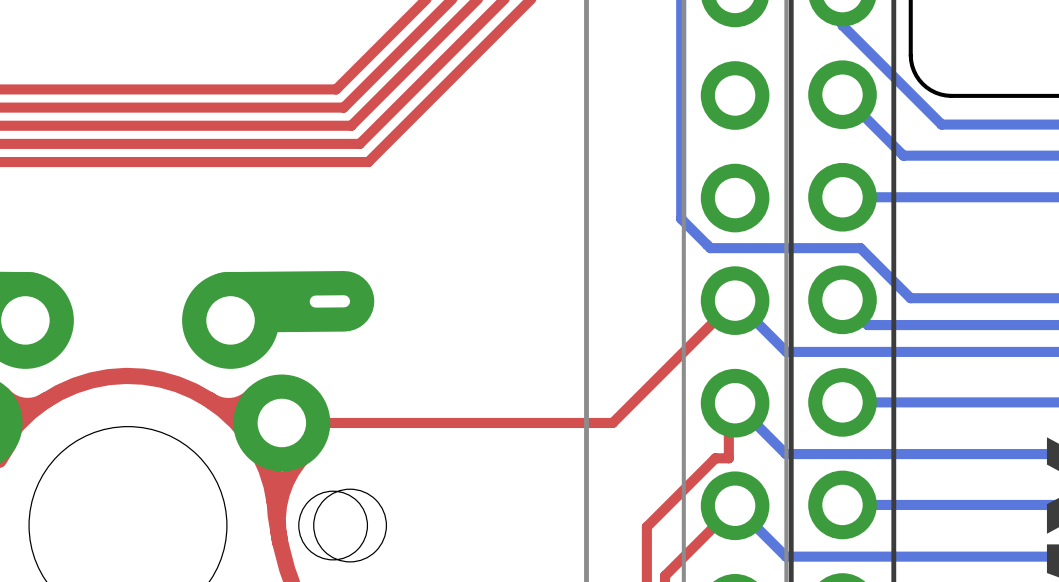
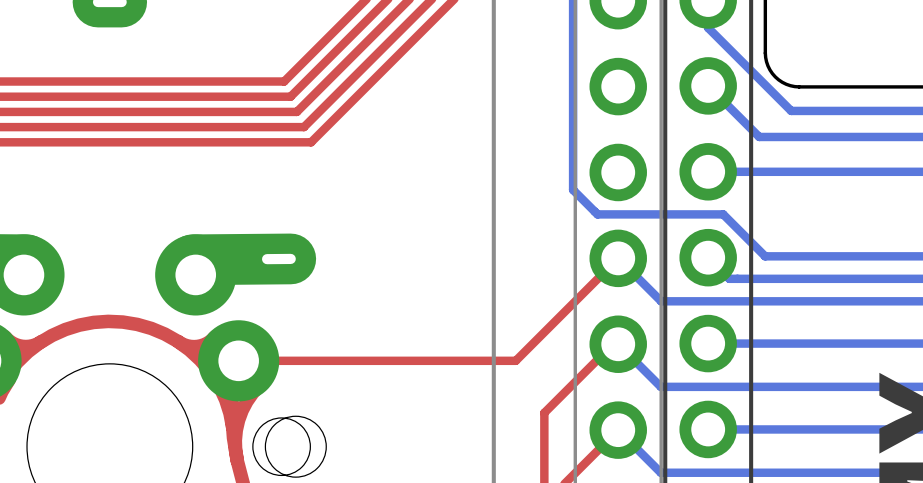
top track: (728, 403) (728, 458) (715, 458) (646, 526) -> (613, 344) (544, 412) (544, 447)

